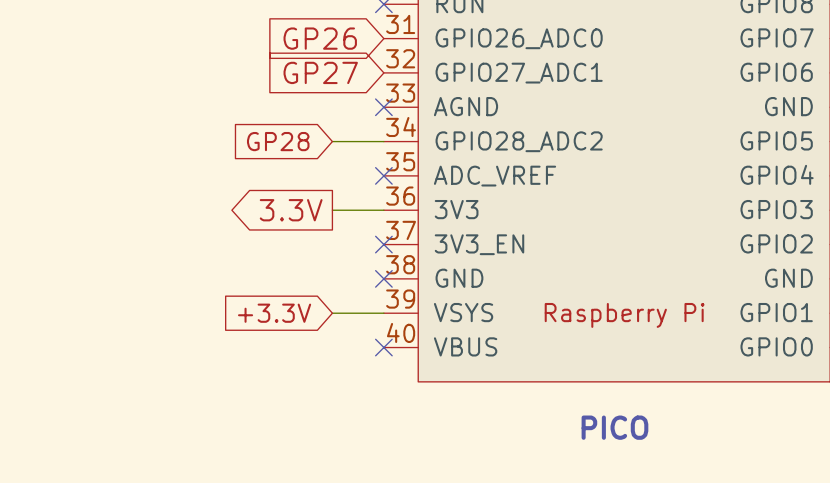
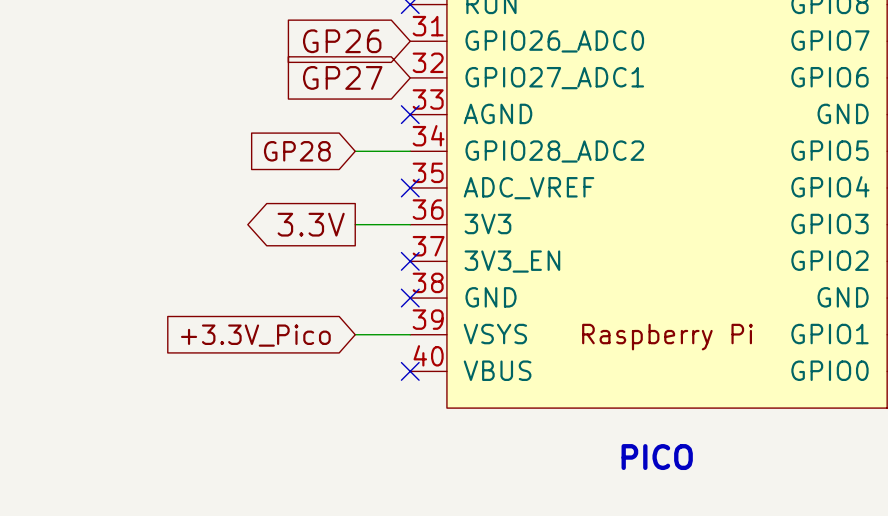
global label: +3.3V (274, 313) -> +3.3V_Pico (255, 335)

